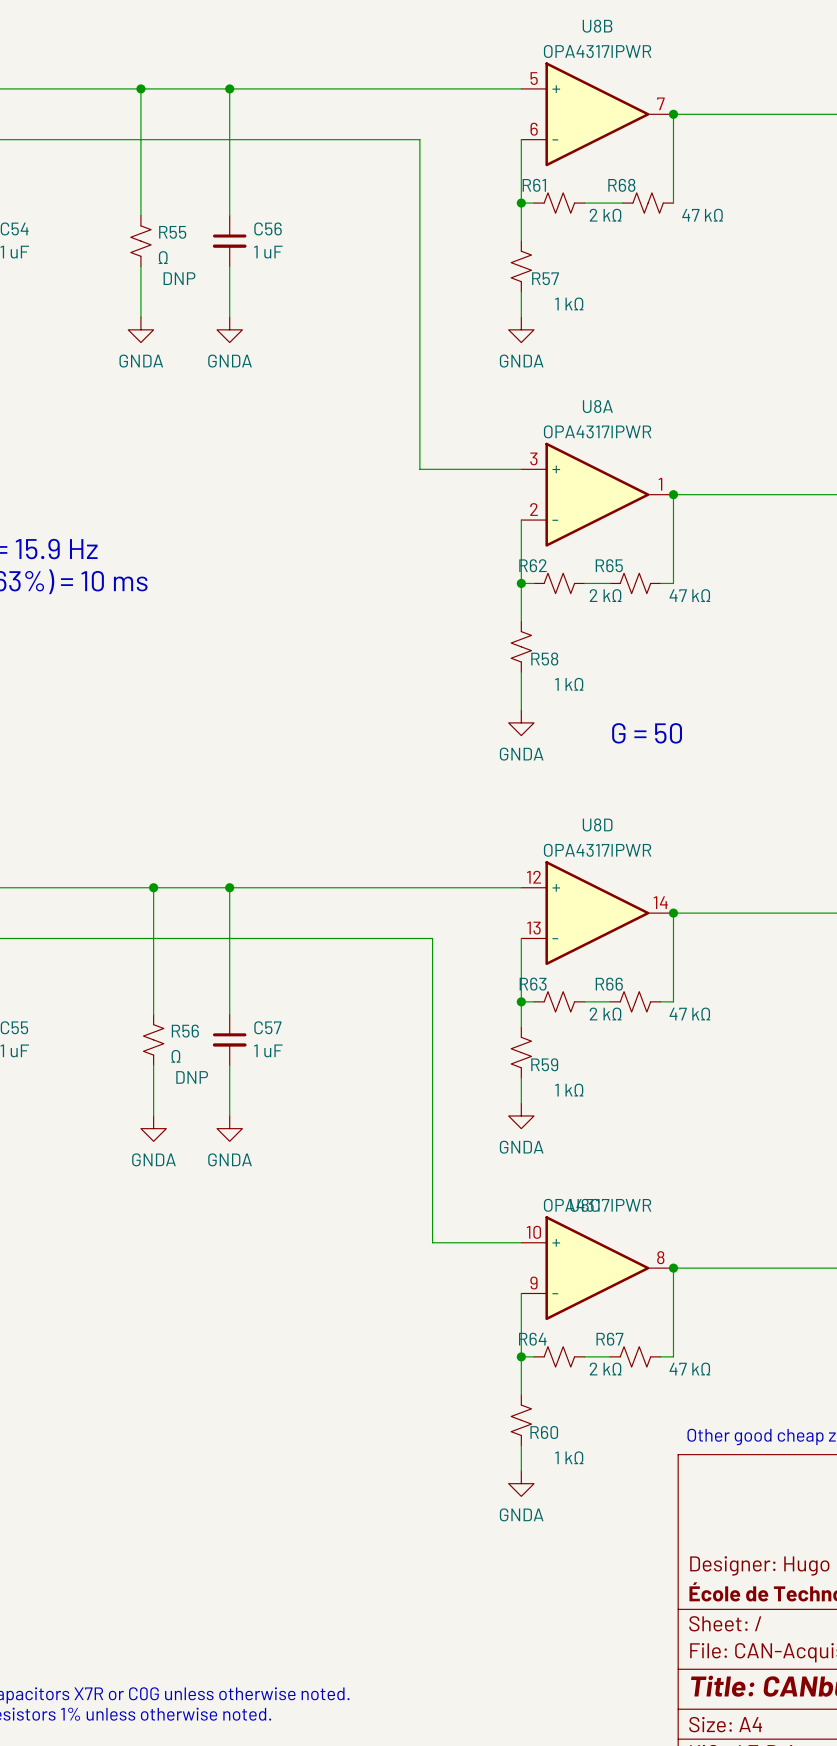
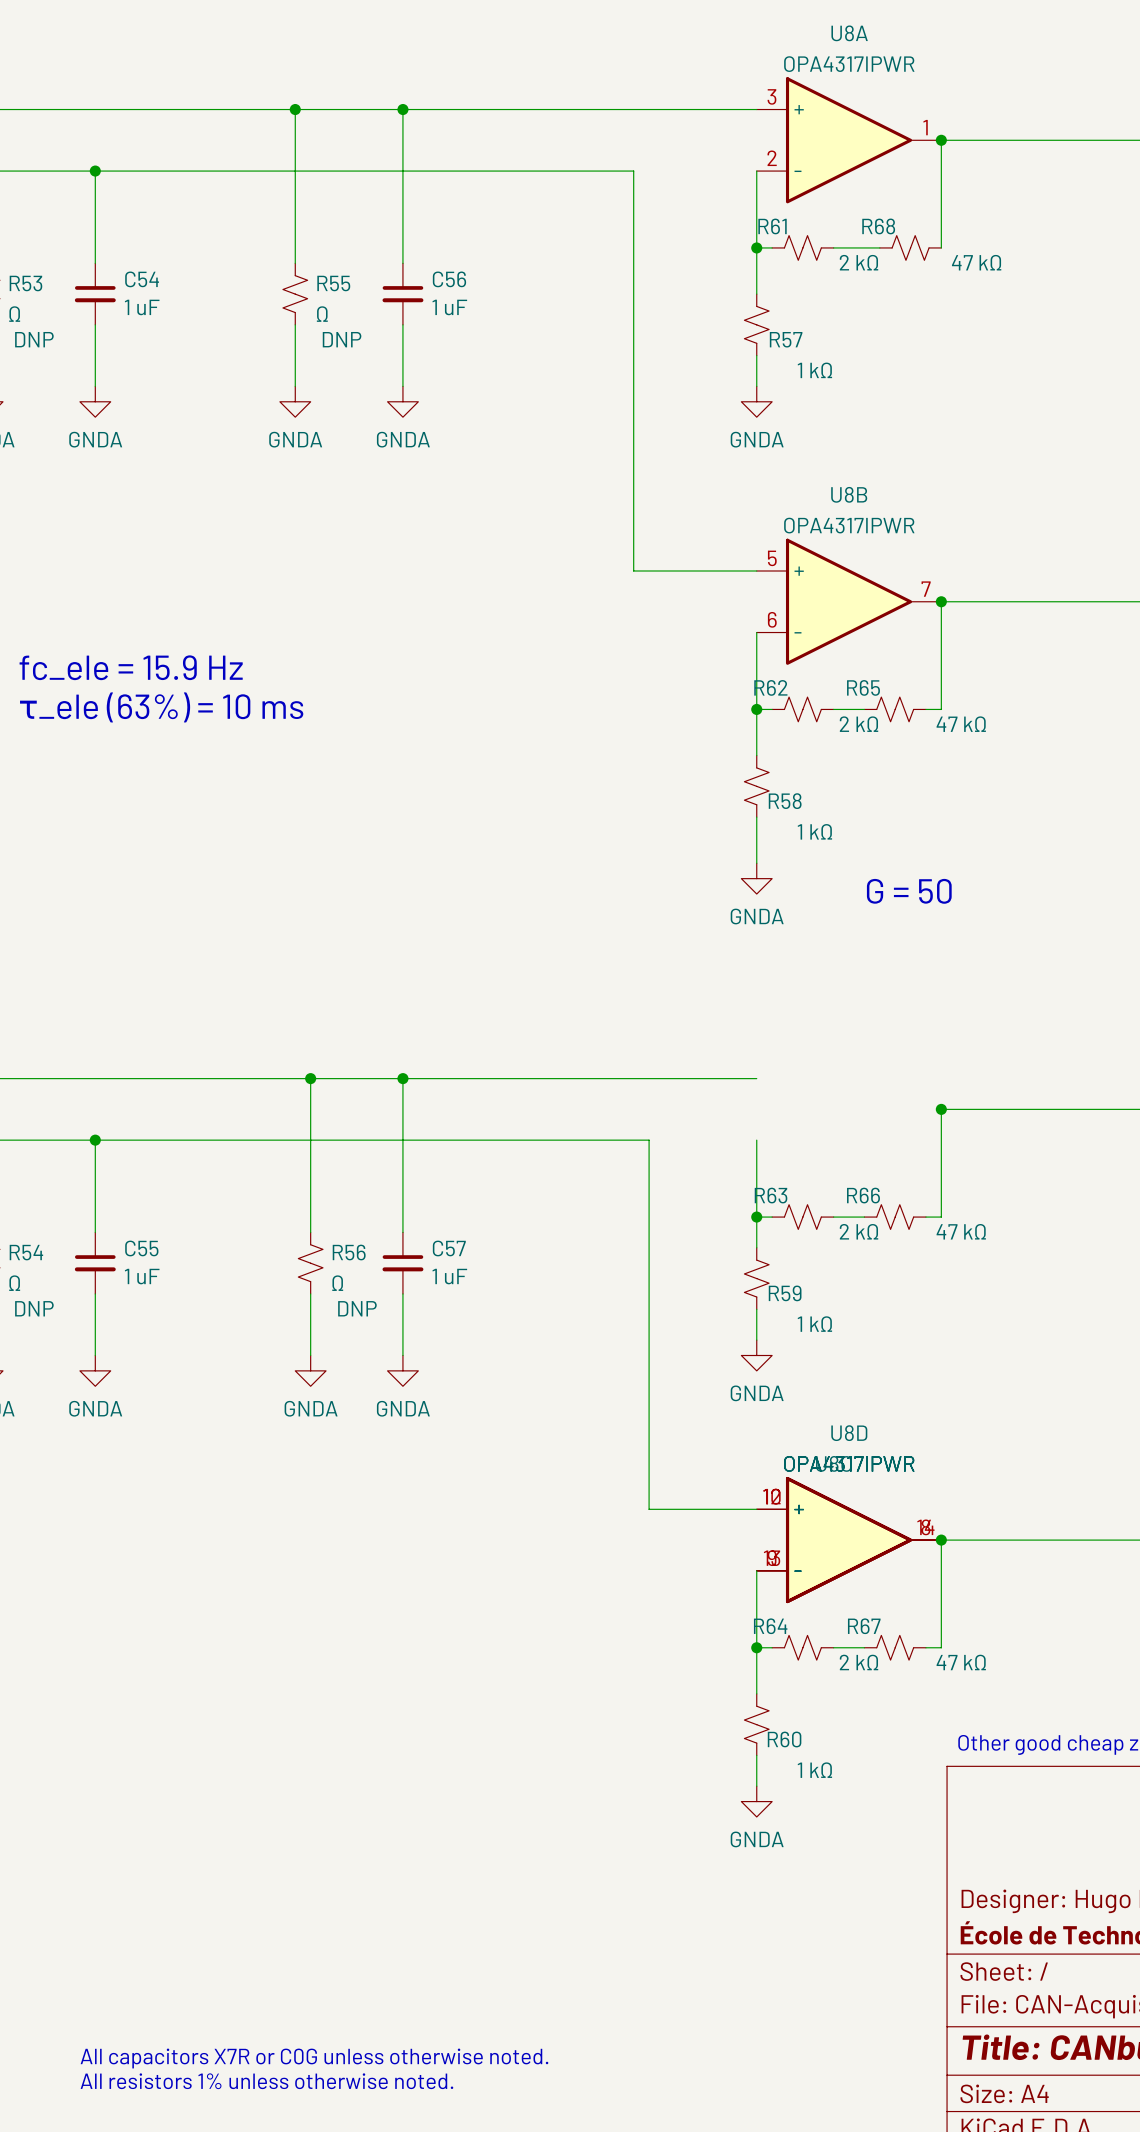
U8B position: (597, 114) -> (849, 601)
U8A position: (597, 494) -> (849, 140)
U8D position: (597, 913) -> (849, 1540)

